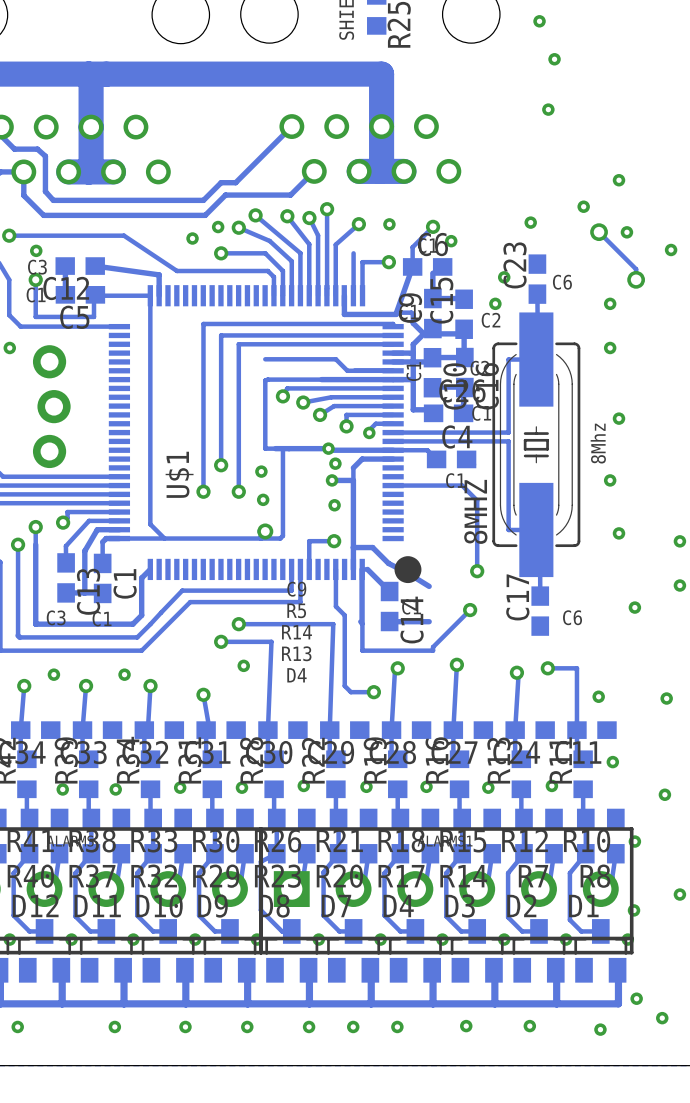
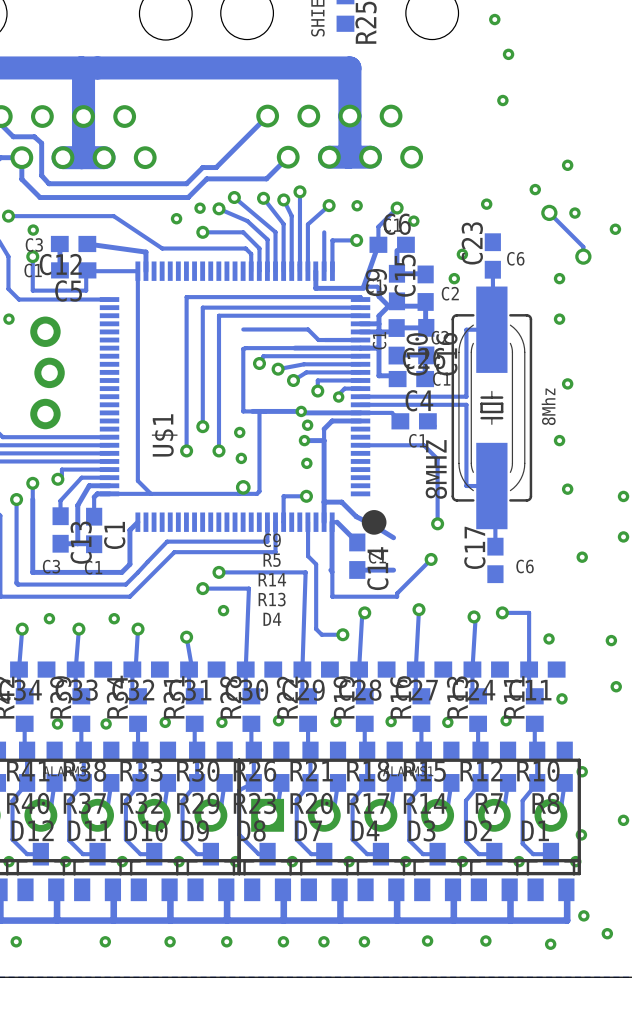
via position: (664, 794) -> (616, 686)

